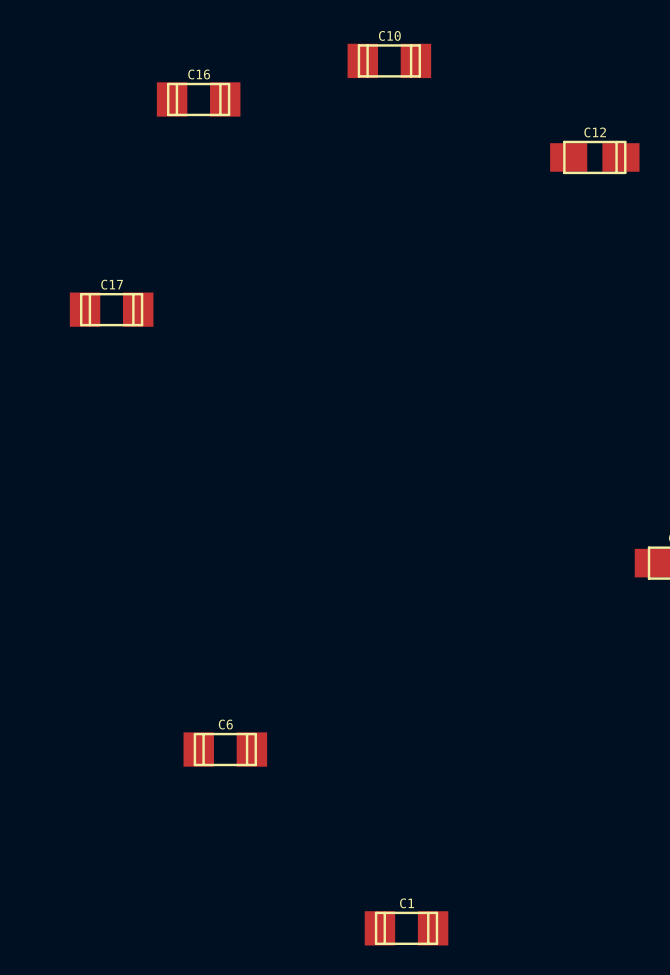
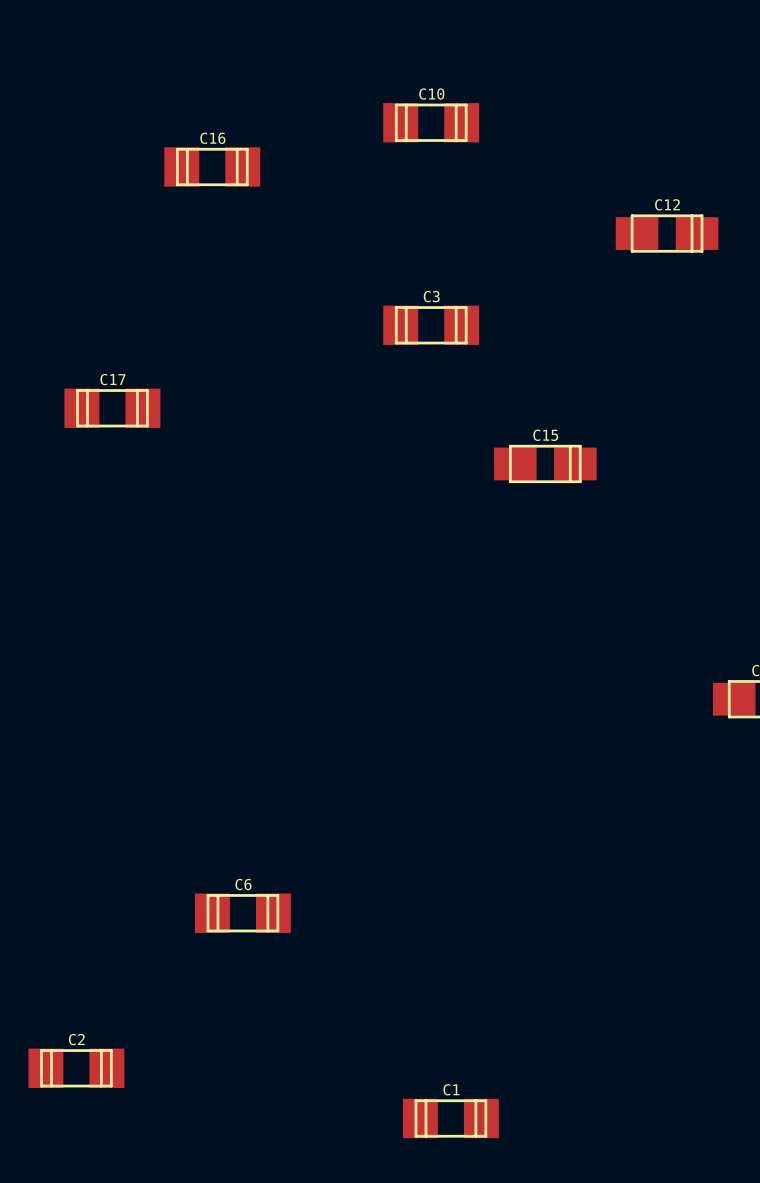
C3: none -> (431, 325)
C15: none -> (545, 463)
C2: none -> (76, 1068)

